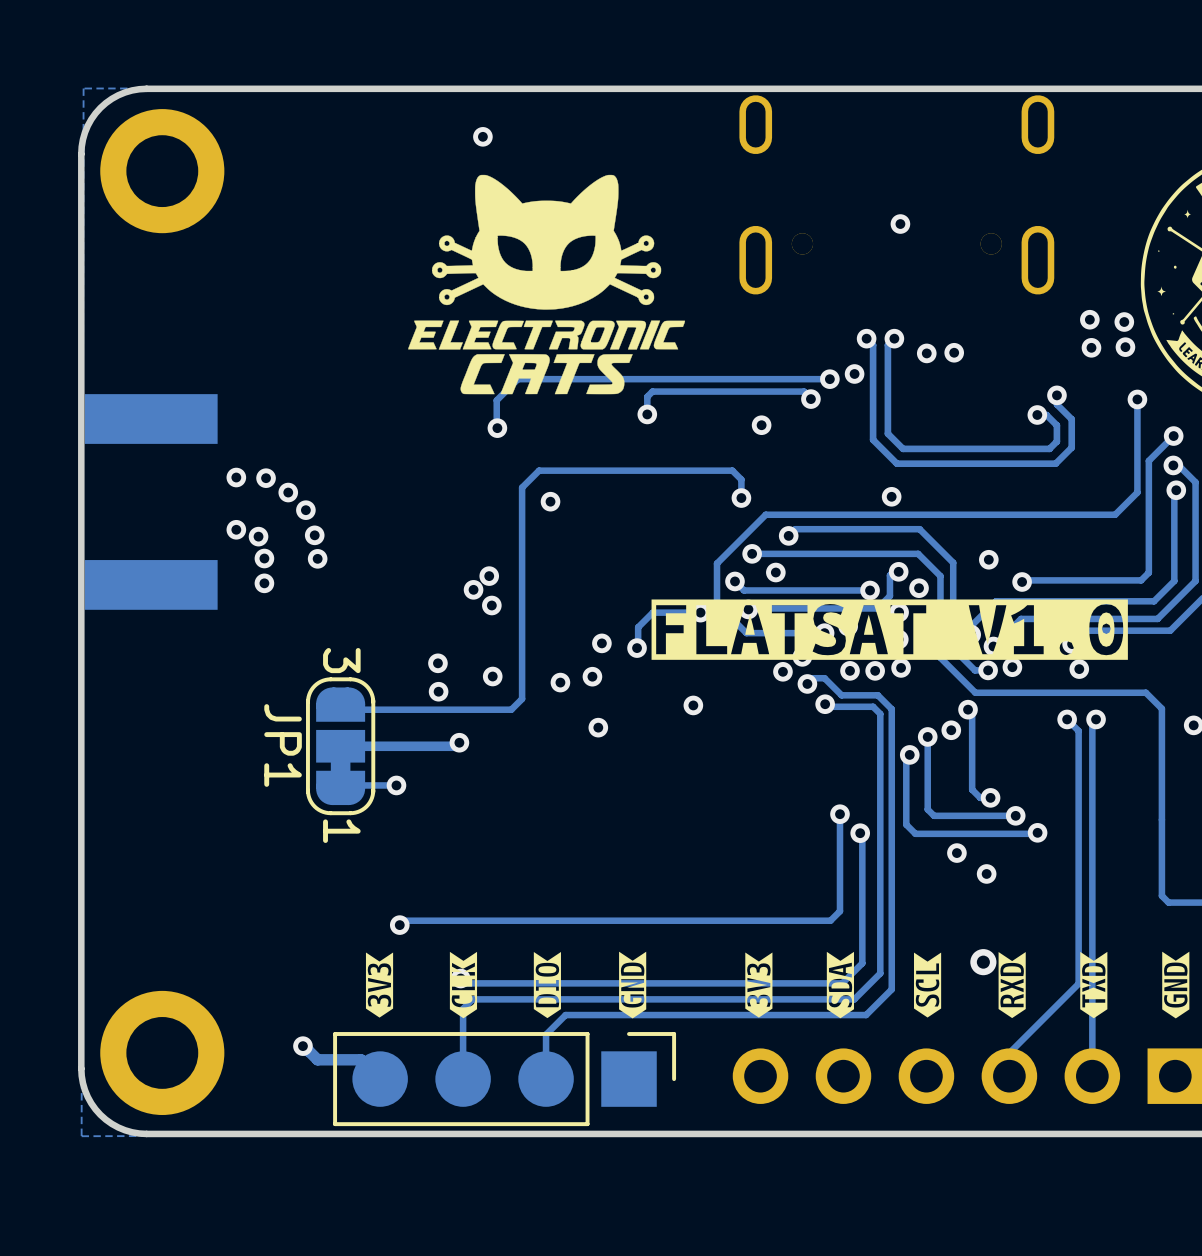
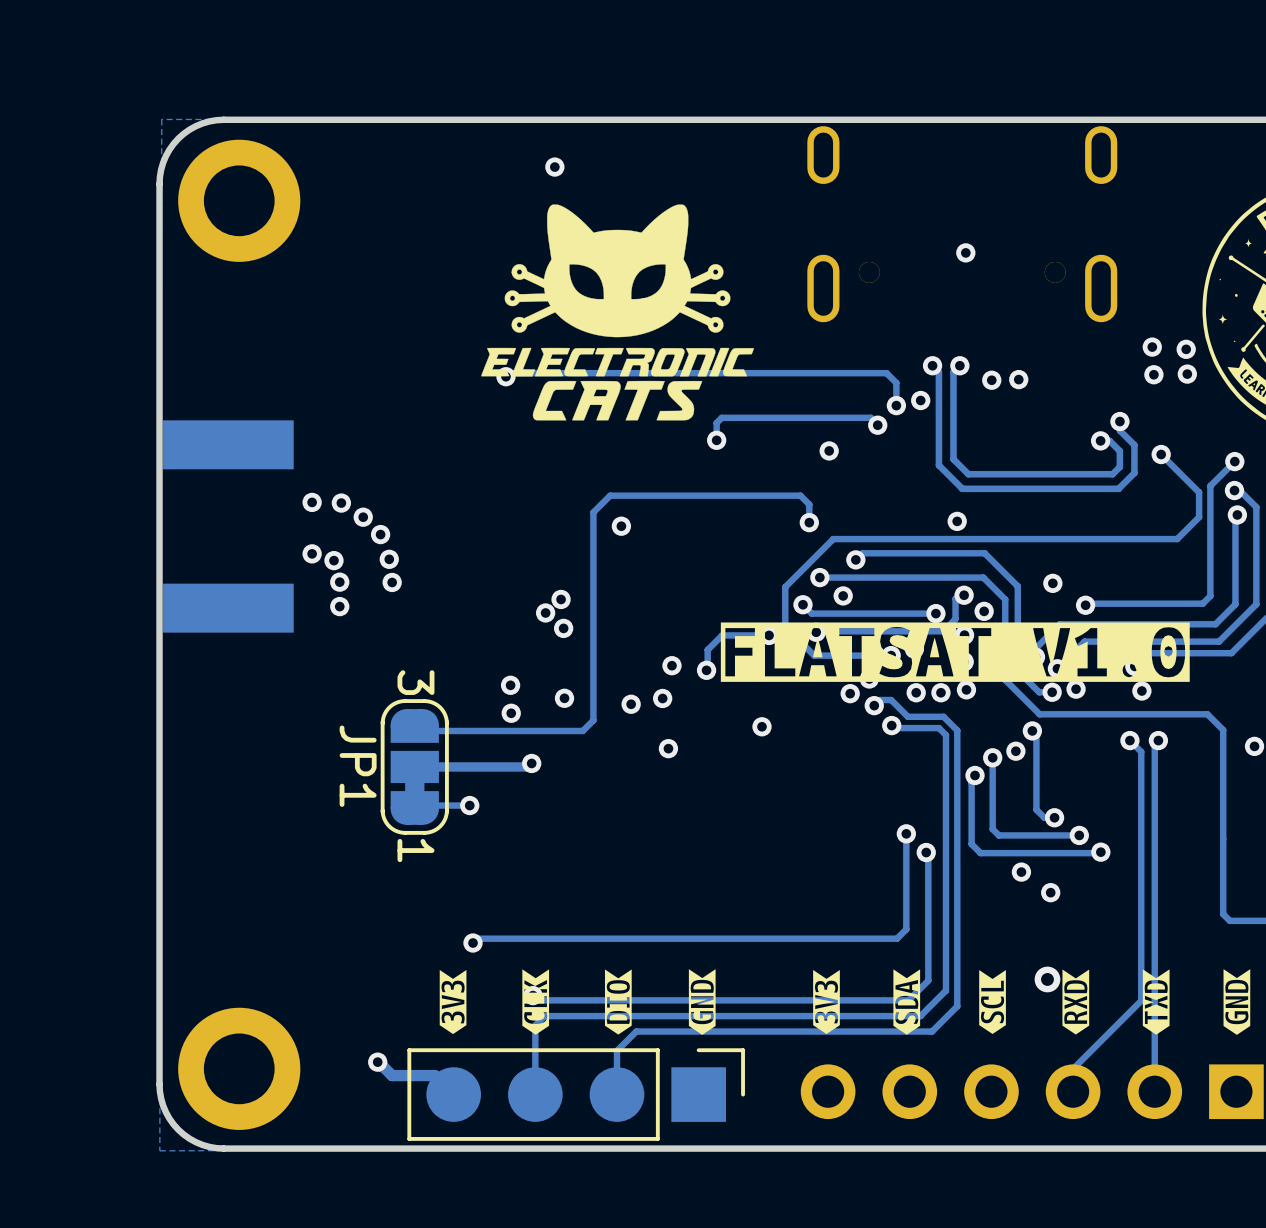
track: (829, 379) (517, 379) (496, 400) (497, 428) -> (896, 405) (896, 382) (886, 373) (509, 373) (505, 376)
track: (1137, 399) (1137, 467) -> (1161, 454) (1199, 492)
via position: (1137, 399) -> (1161, 454)
via position: (497, 428) -> (505, 376)

